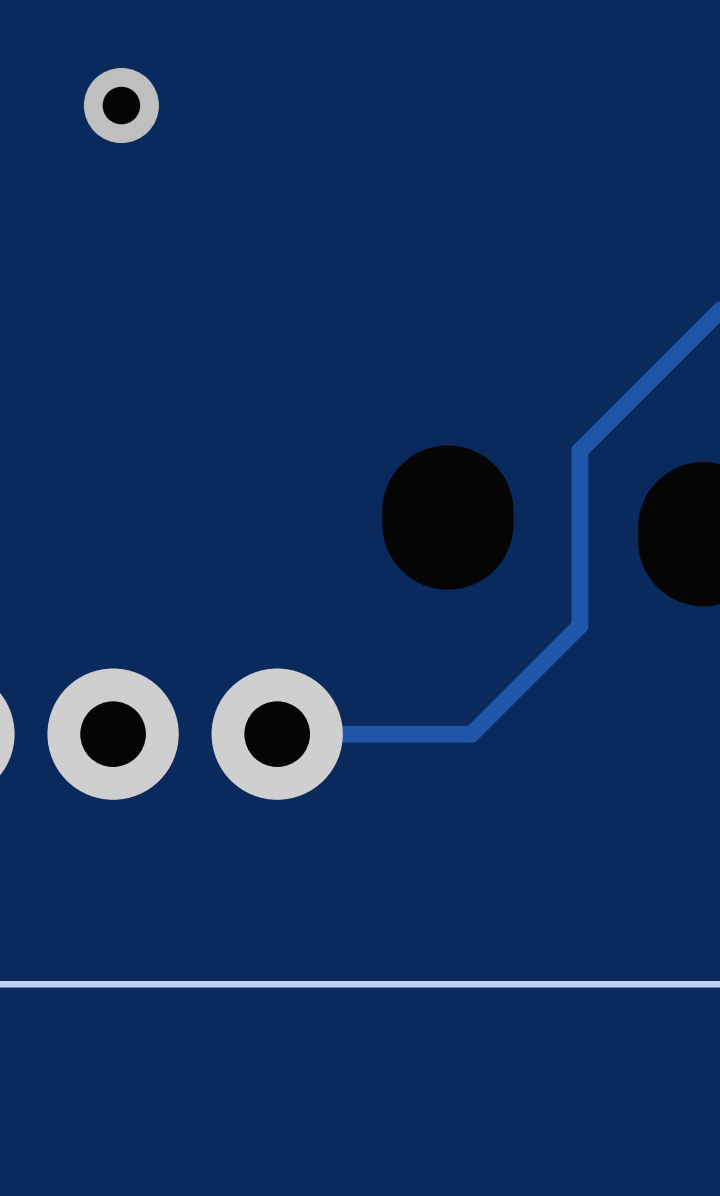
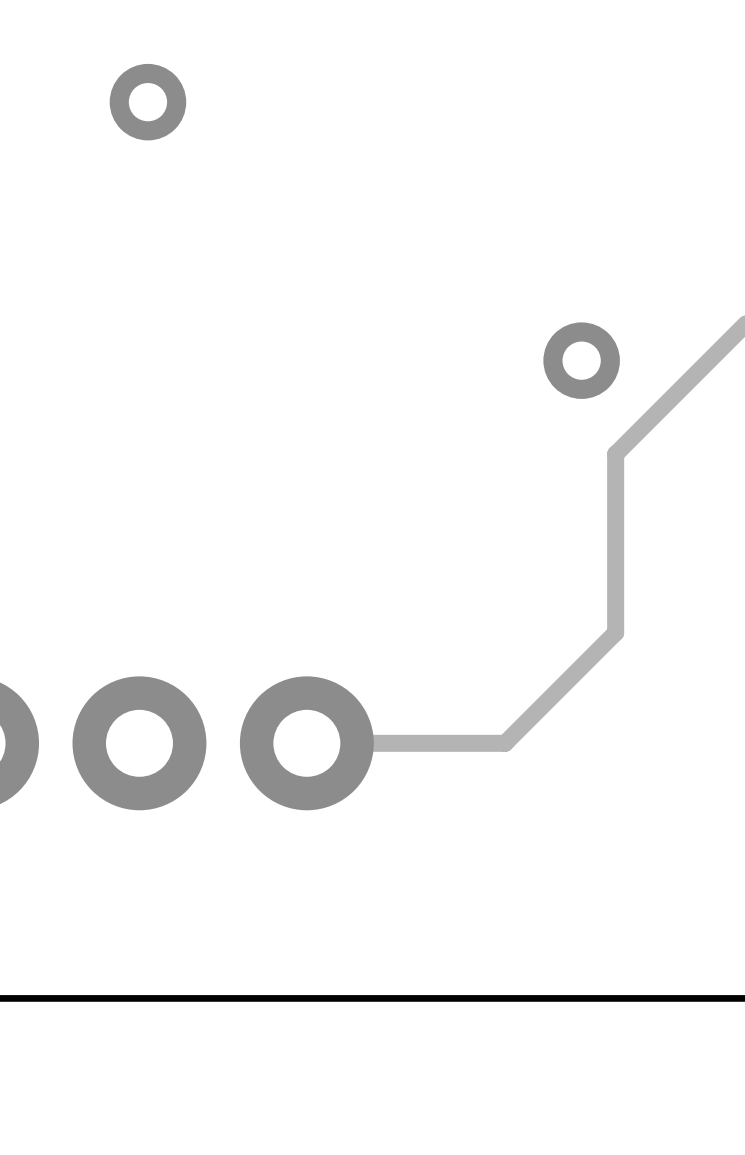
via: none -> (581, 360)

